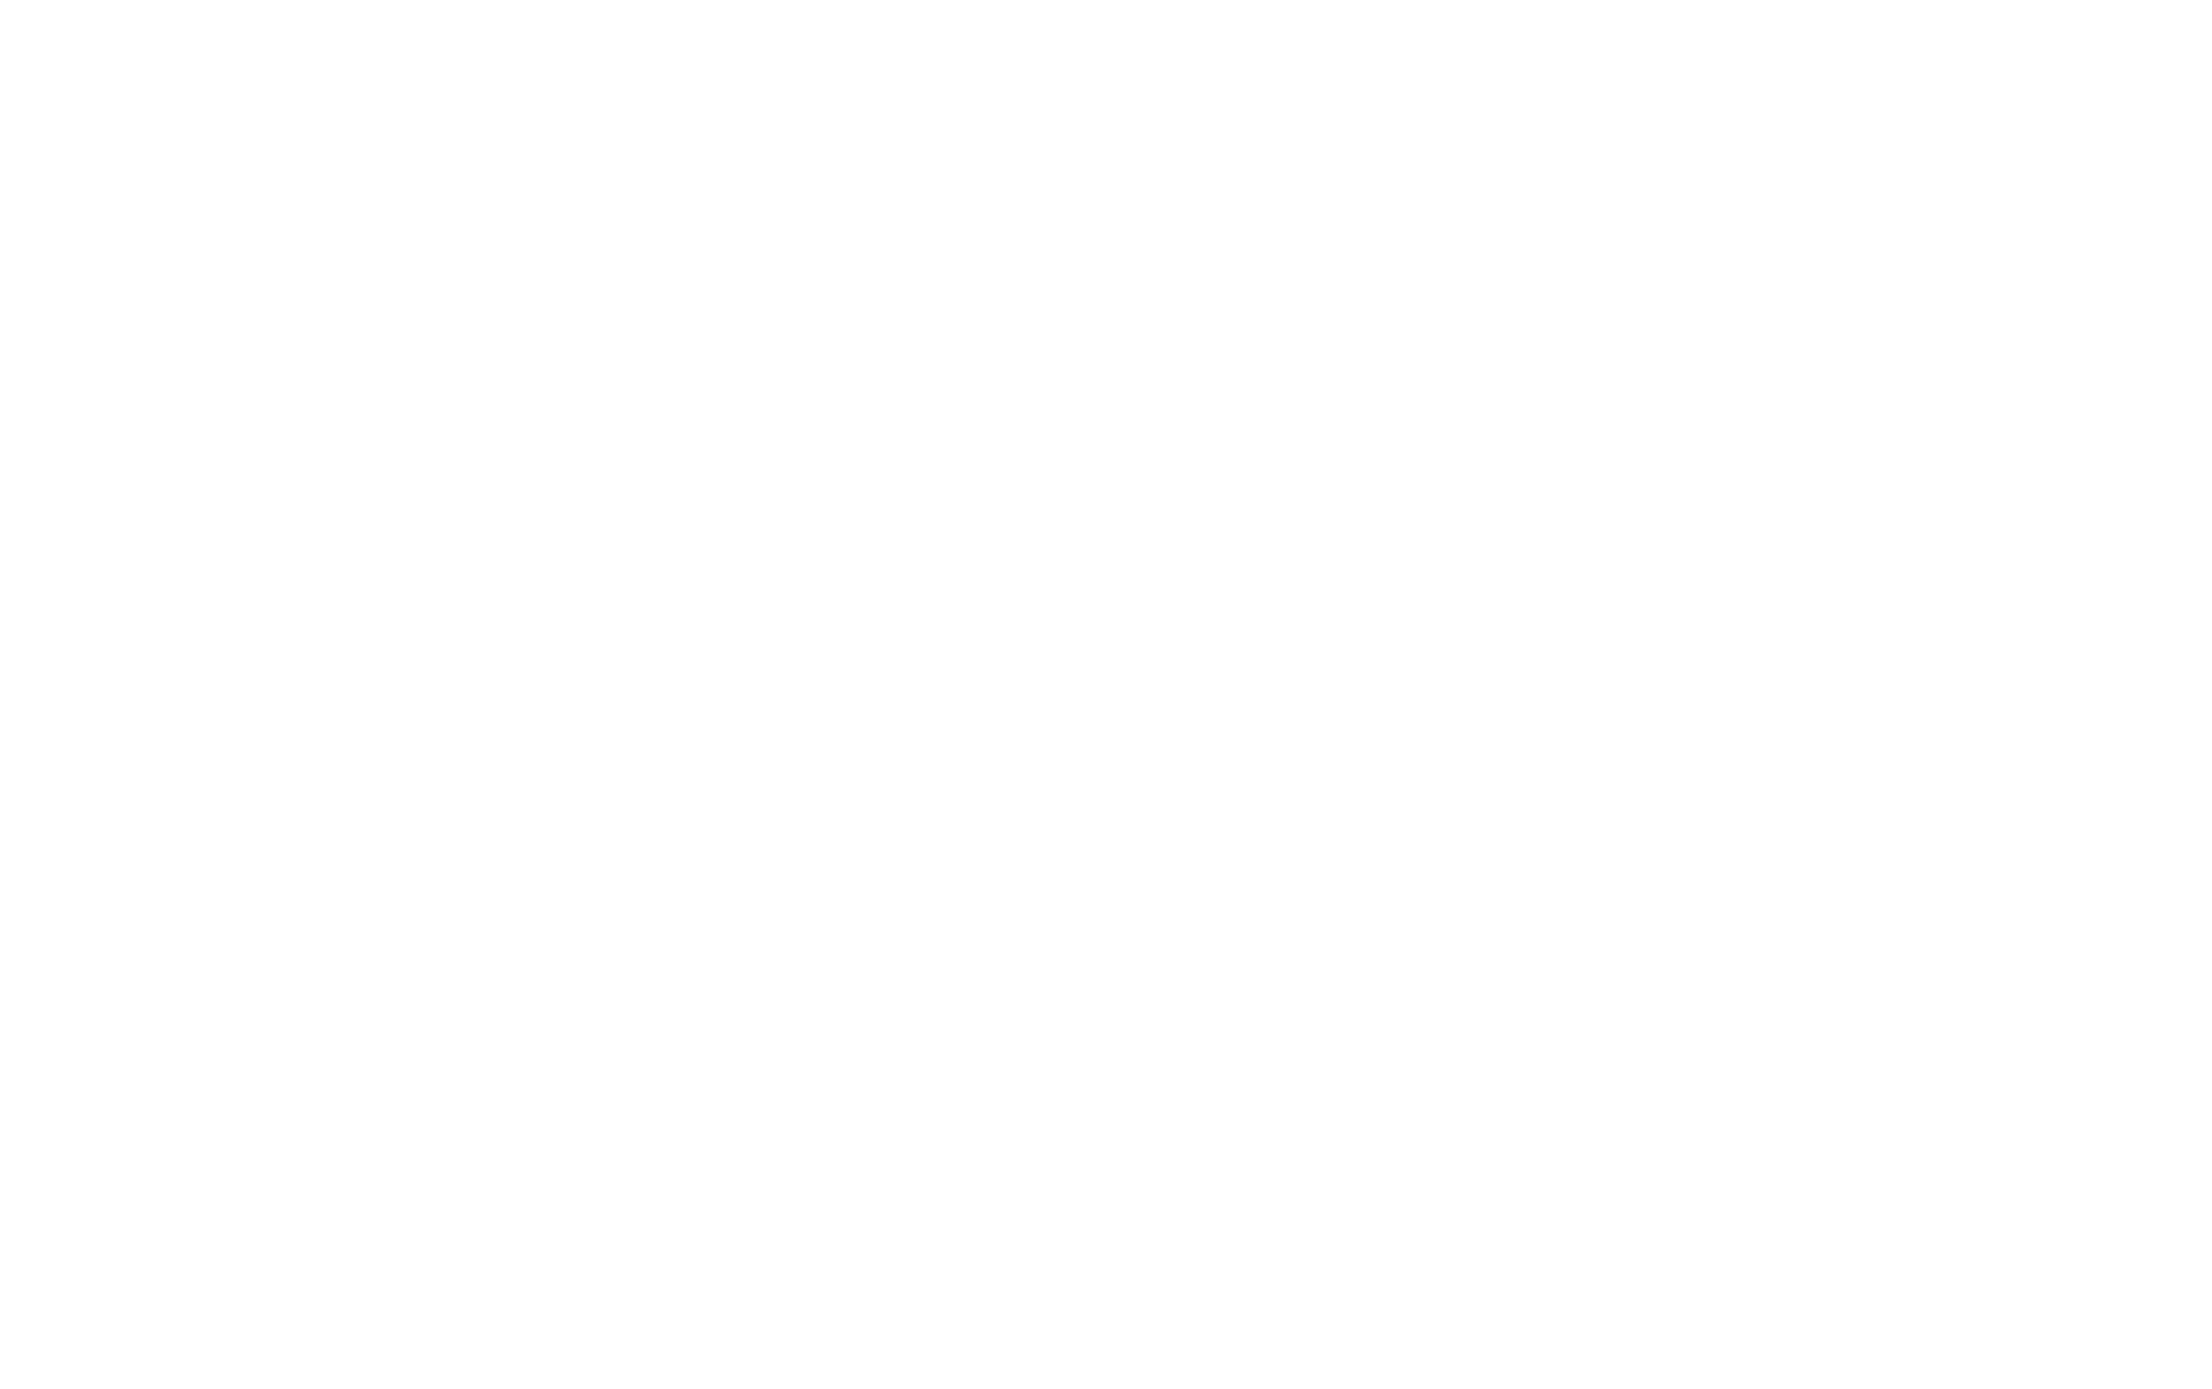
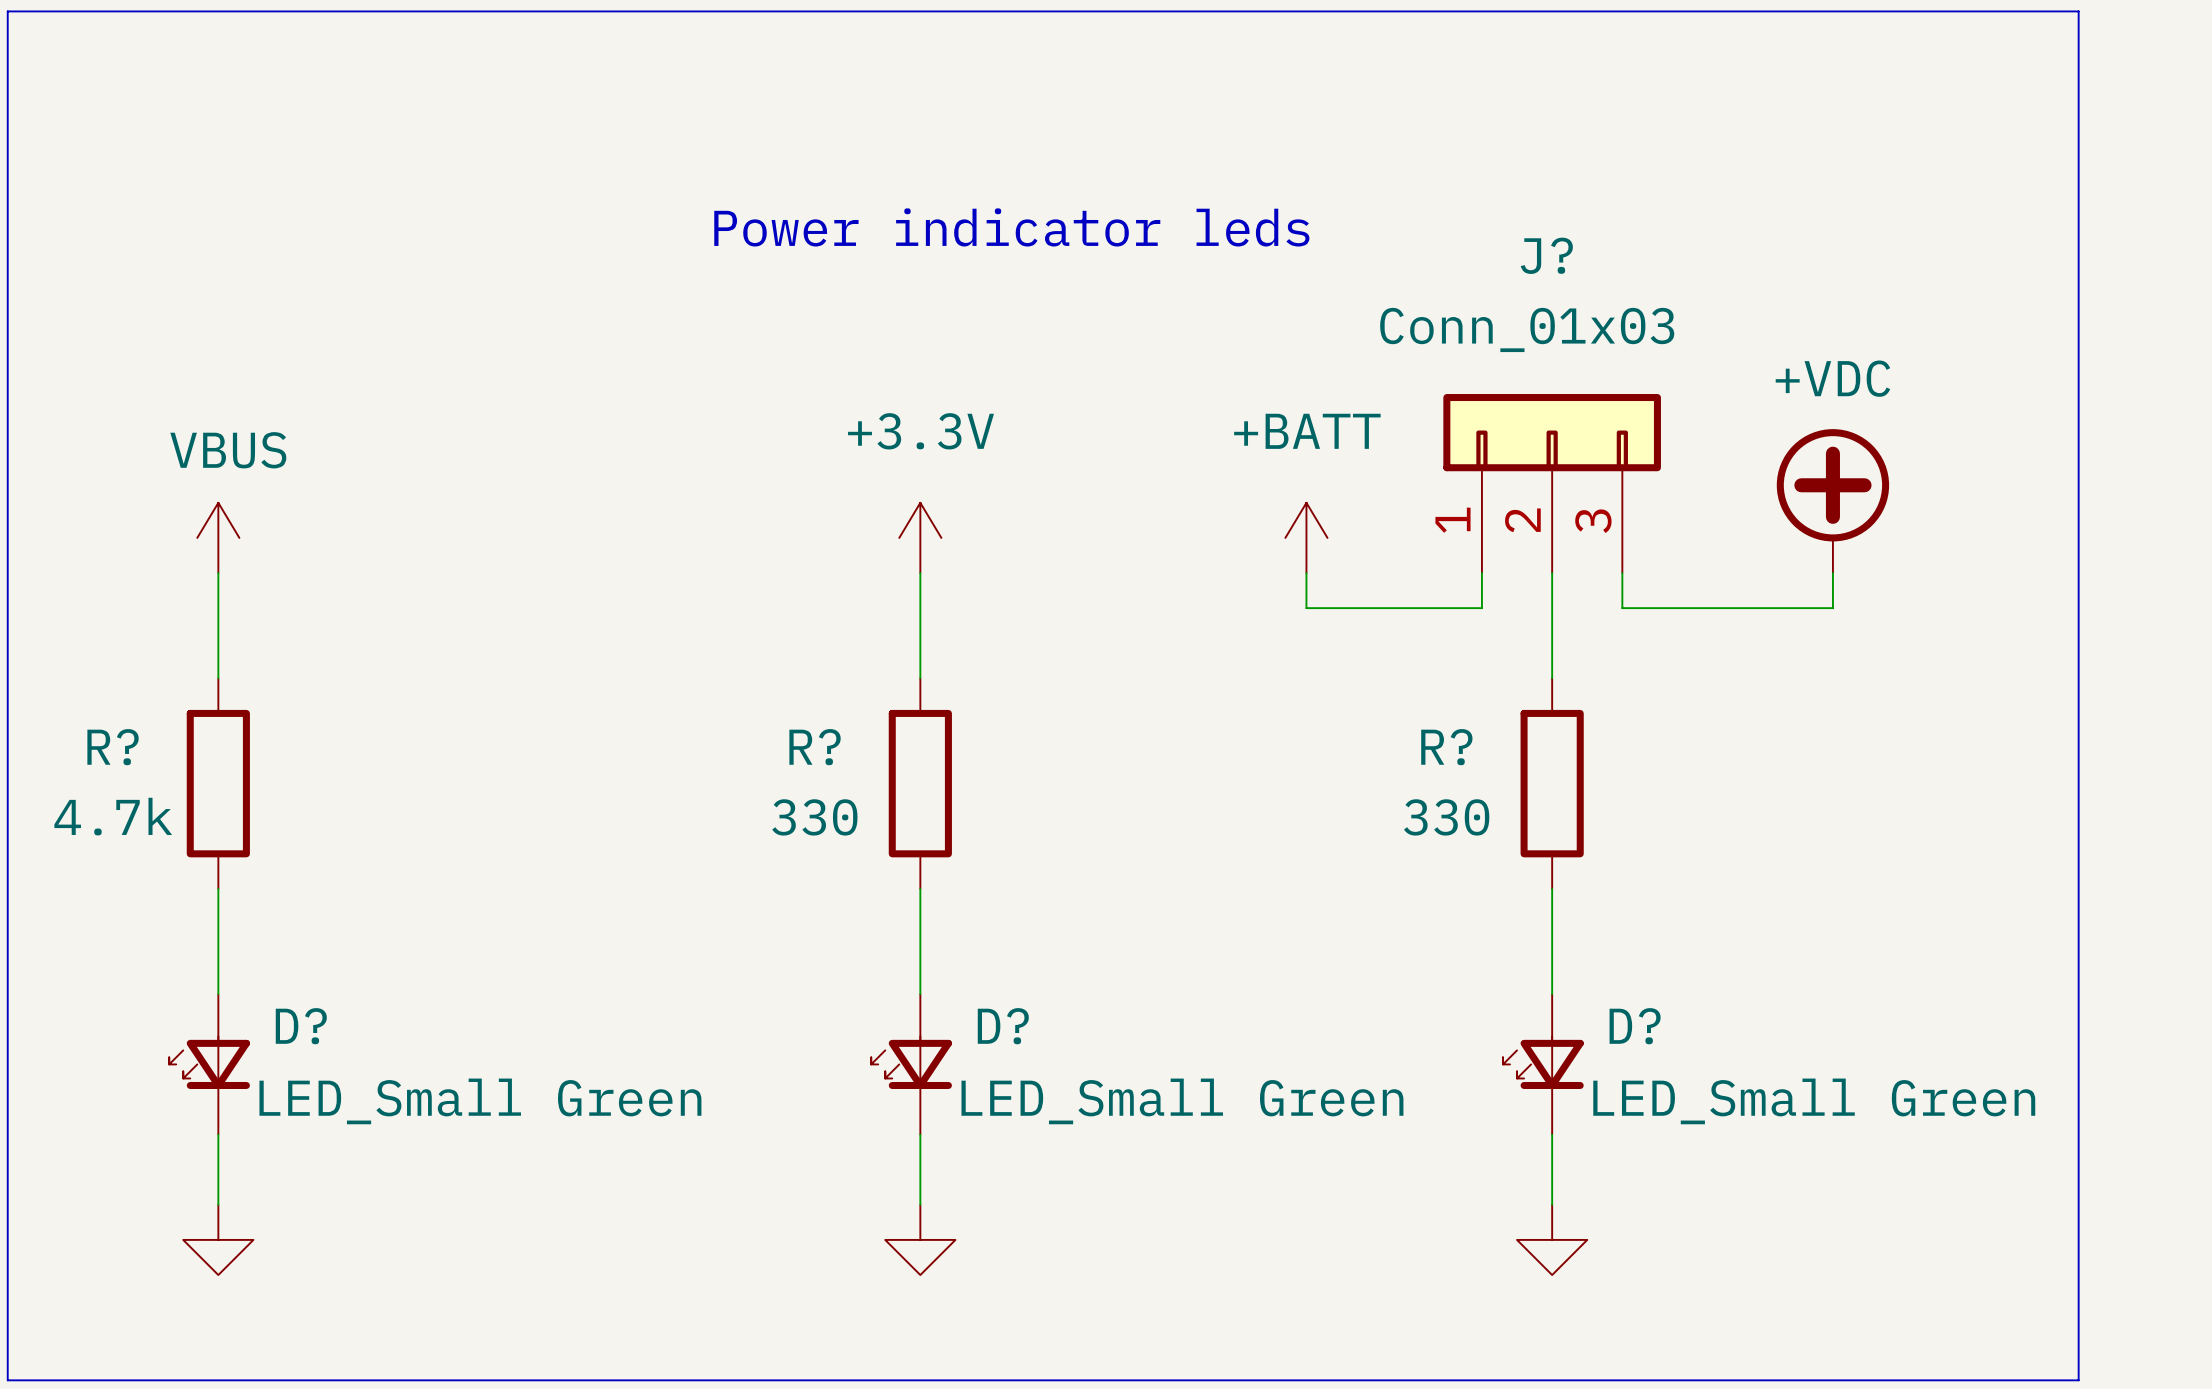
line: none -> (7, 11) (2078, 11) (2078, 1380) (7, 1380) (7, 11)
text: none -> Power indicator leds (1011, 227)
J?: none -> Conn_01x03 (1552, 483)
power symbol: none -> +VDC (1832, 501)
power symbol: none -> VBUS (218, 537)
power symbol: none -> +3.3V (920, 537)
power symbol: none -> +BATT (1306, 537)
wire: none -> (218, 573) (218, 678)
wire: none -> (920, 573) (920, 678)
wire: none -> (1306, 573) (1306, 608) (1481, 608) (1481, 573)
wire: none -> (1552, 573) (1552, 678)
wire: none -> (1622, 573) (1622, 608) (1832, 608) (1832, 573)
R?: none -> 4.7k (218, 783)
R?: none -> 330 (920, 783)
R?: none -> 330 (1552, 783)
wire: none -> (218, 888) (218, 994)
wire: none -> (920, 888) (920, 994)
wire: none -> (1552, 888) (1552, 994)
D?: none -> LED_Small Green (209, 1064)
D?: none -> LED_Small Green (911, 1064)
D?: none -> LED_Small Green (1543, 1064)
wire: none -> (218, 1134) (218, 1204)
wire: none -> (920, 1134) (920, 1204)
wire: none -> (1552, 1134) (1552, 1204)
power symbol: none -> (218, 1239)
power symbol: none -> (920, 1239)
power symbol: none -> (1552, 1239)

